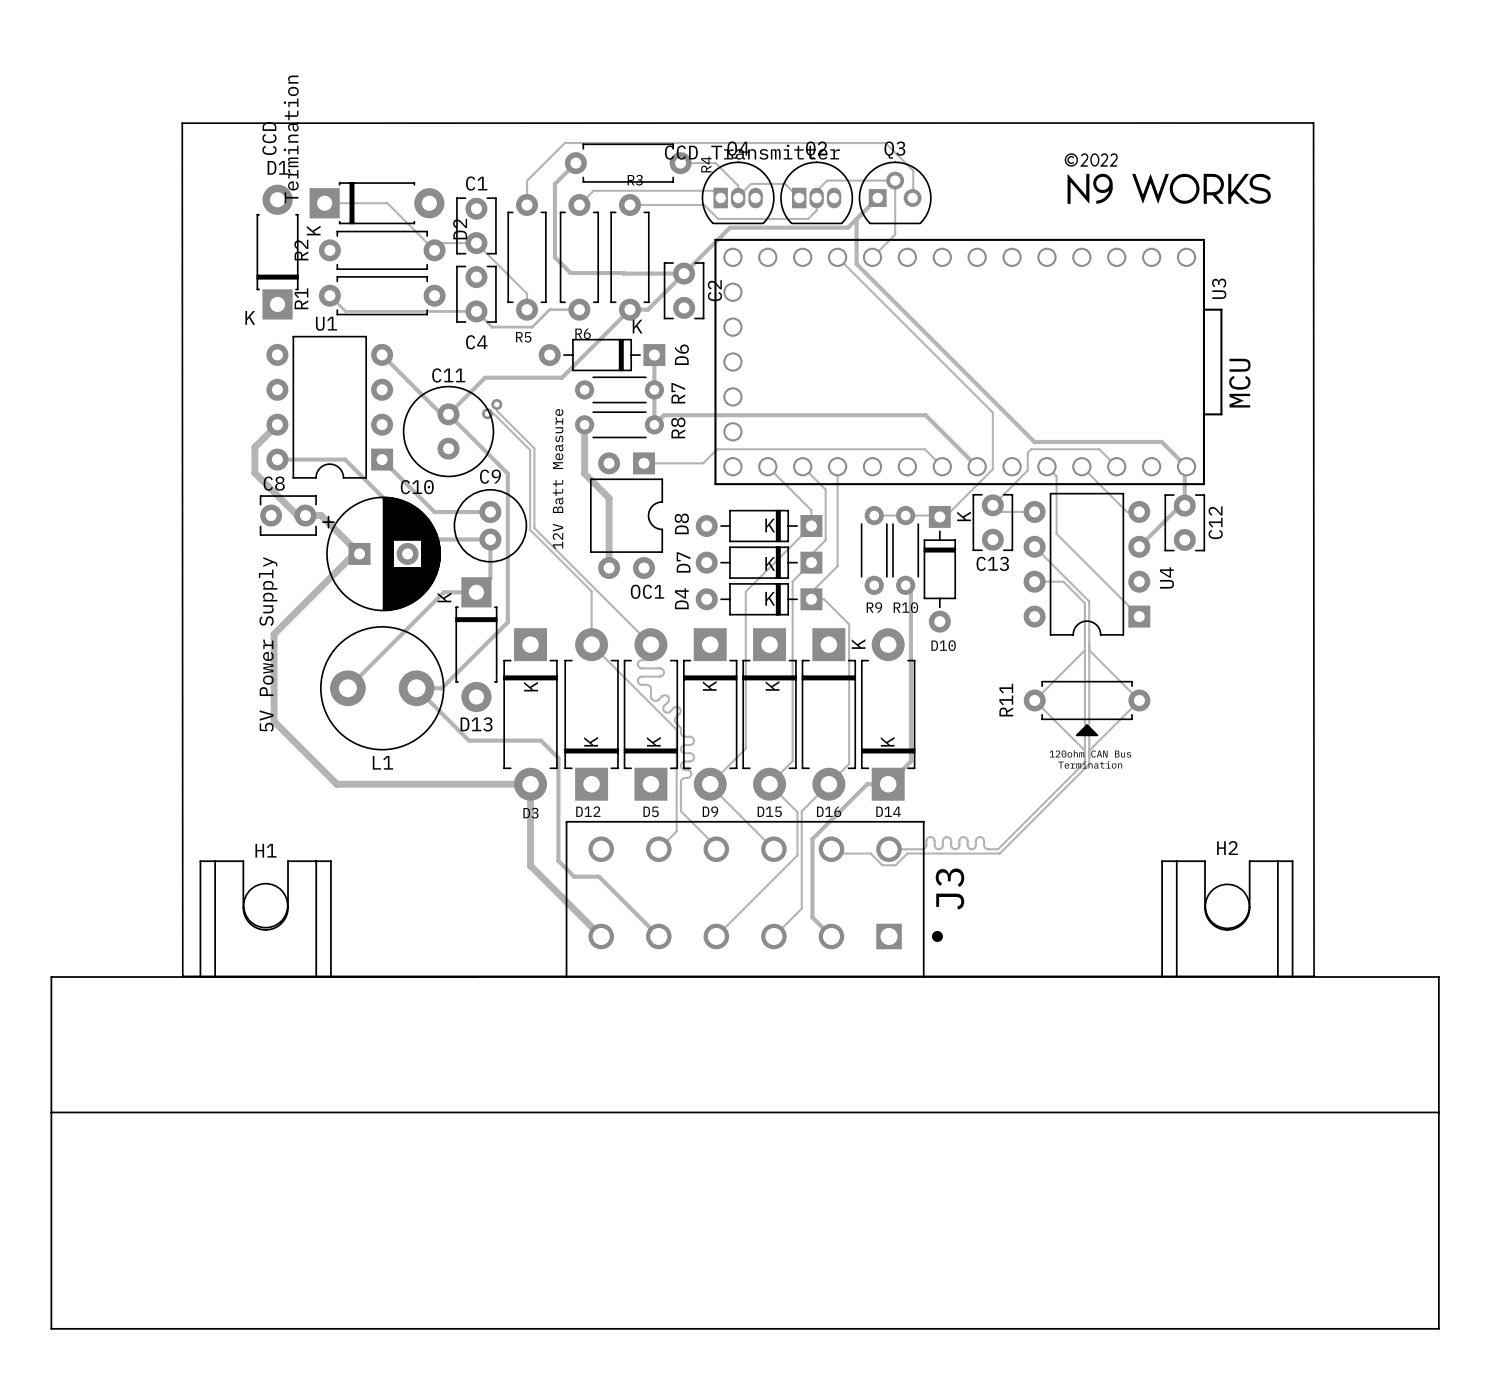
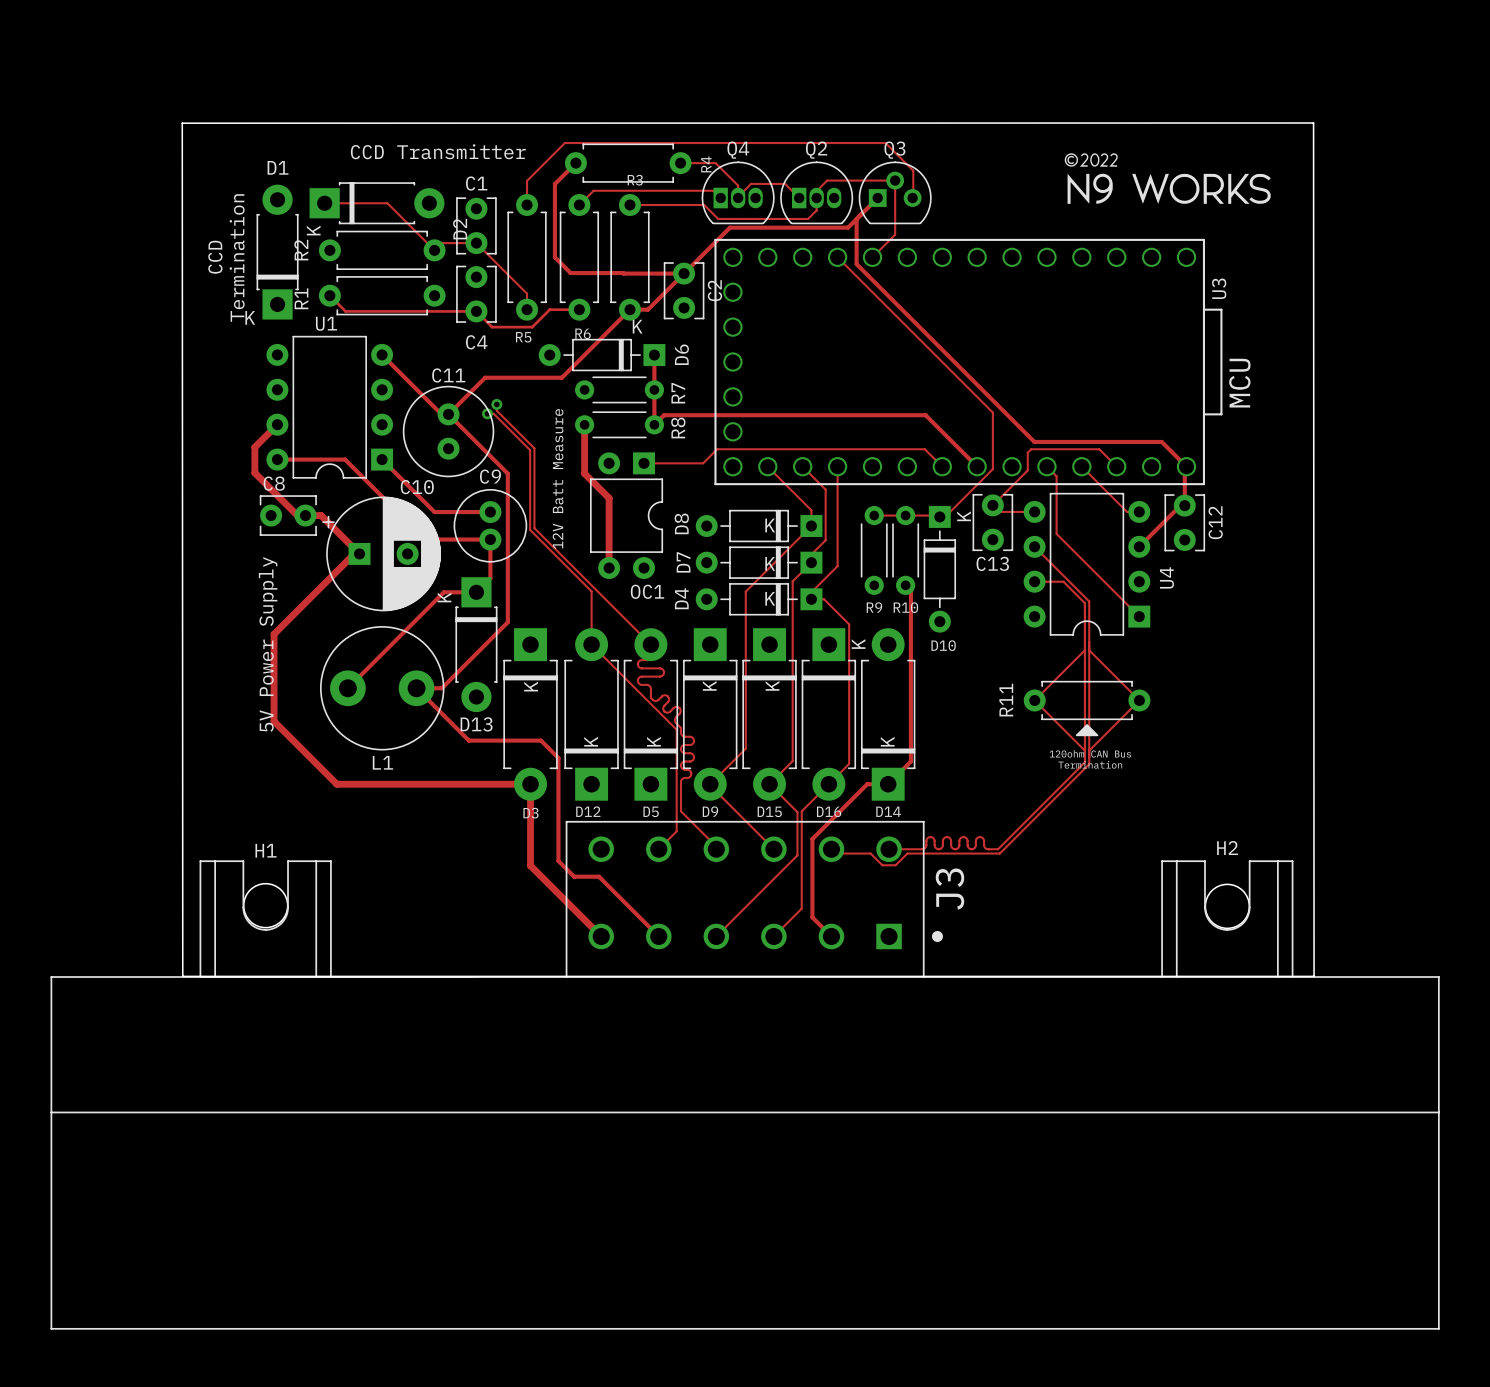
text position: CCD (269, 138) -> CCD (215, 257)
text position: Termination (291, 139) -> Termination (237, 258)
text position: CCD Transmitter (752, 152) -> CCD Transmitter (438, 151)

